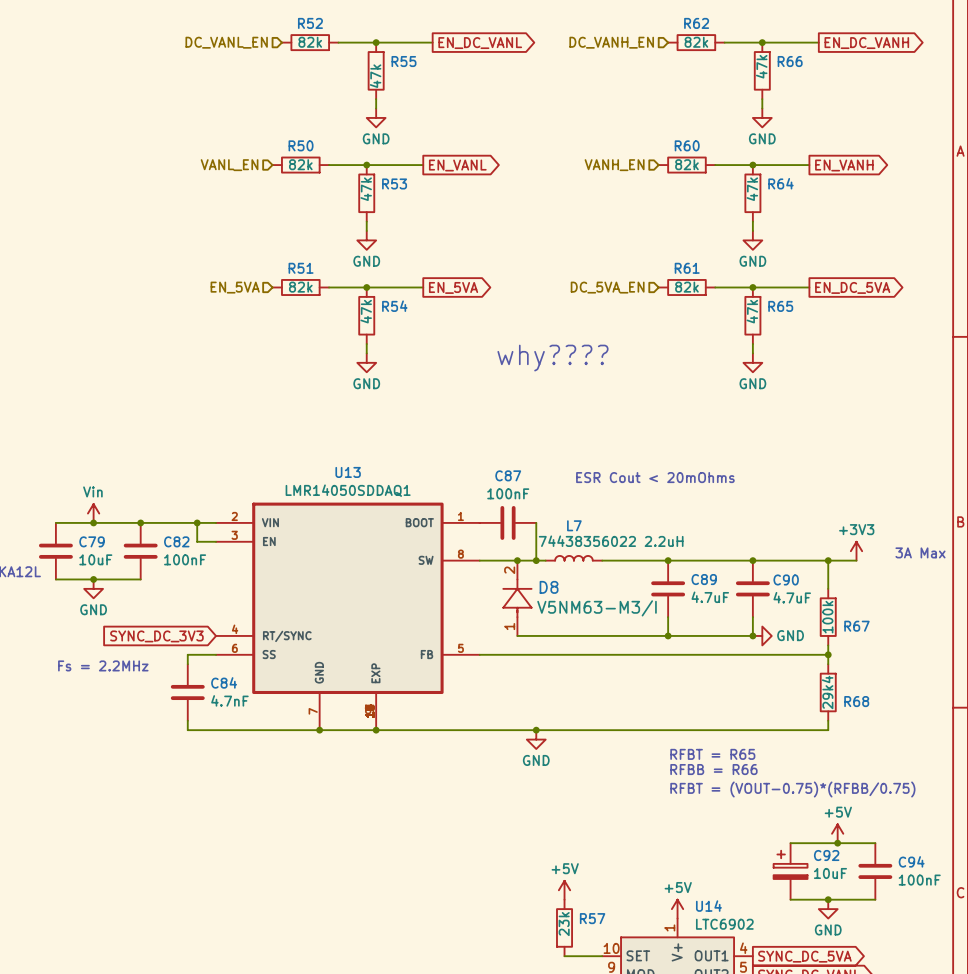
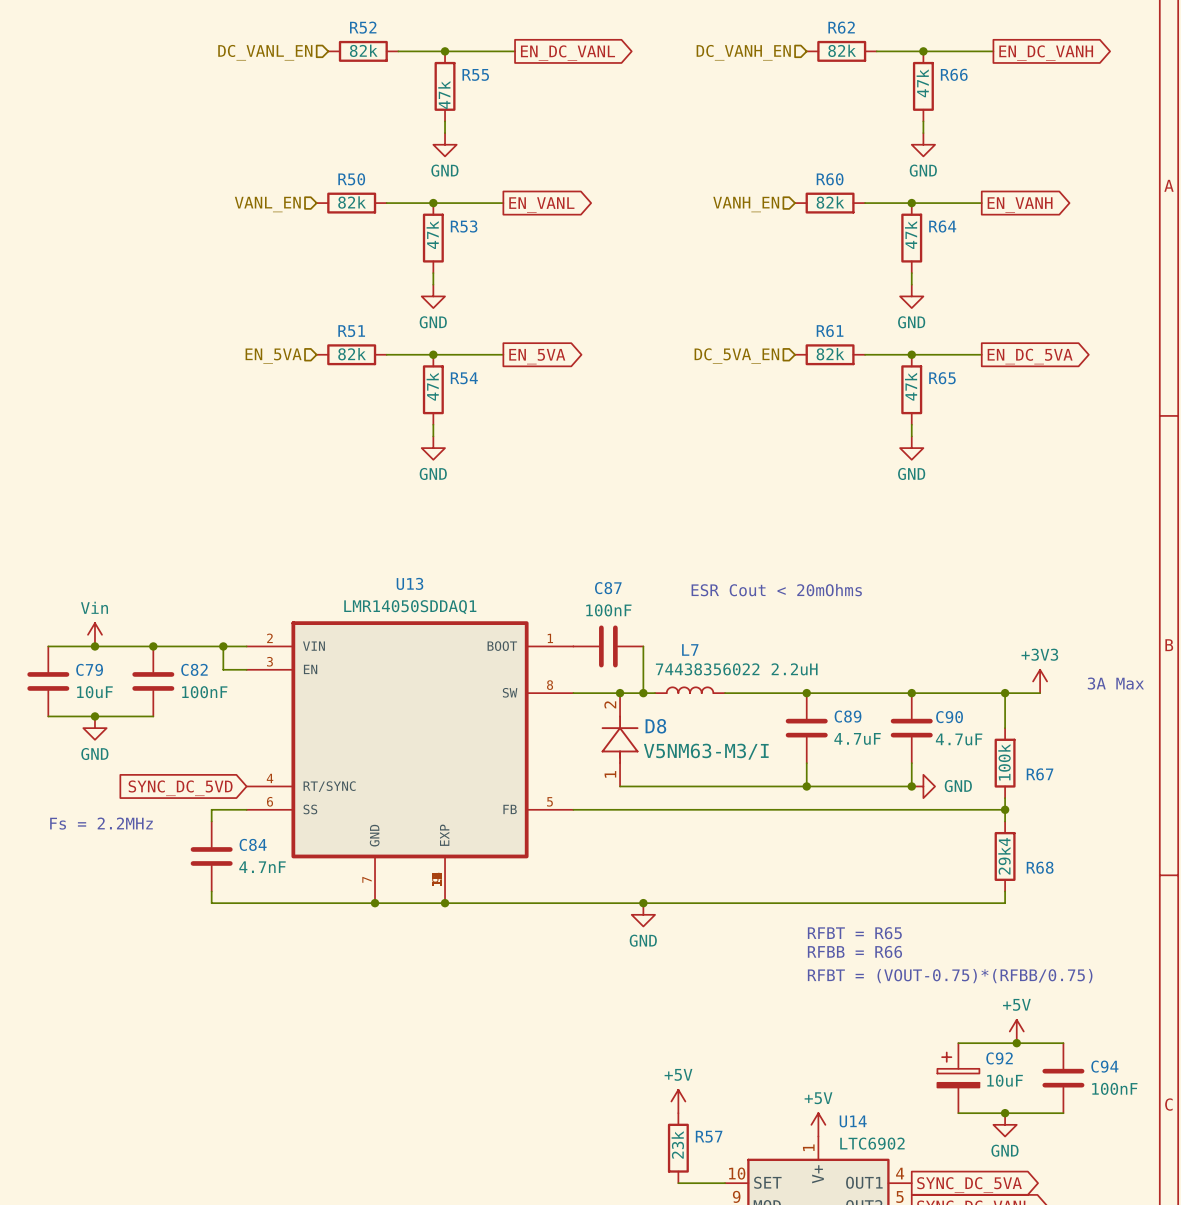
text: why???? (552, 358) -> none
global label: SYNC_DC_3V3 (156, 636) -> SYNC_DC_5VD (180, 788)

